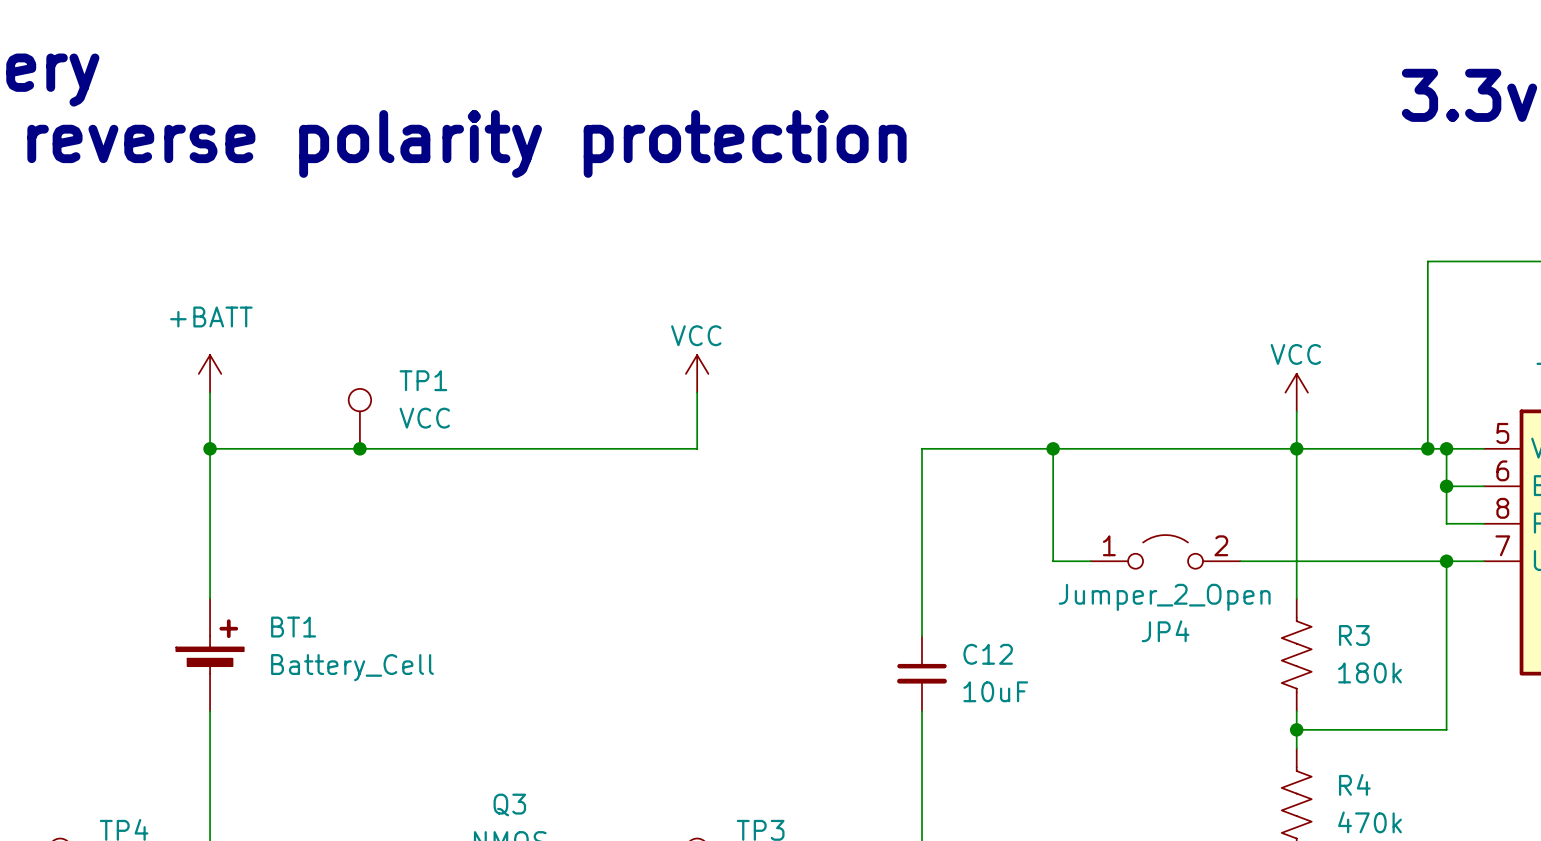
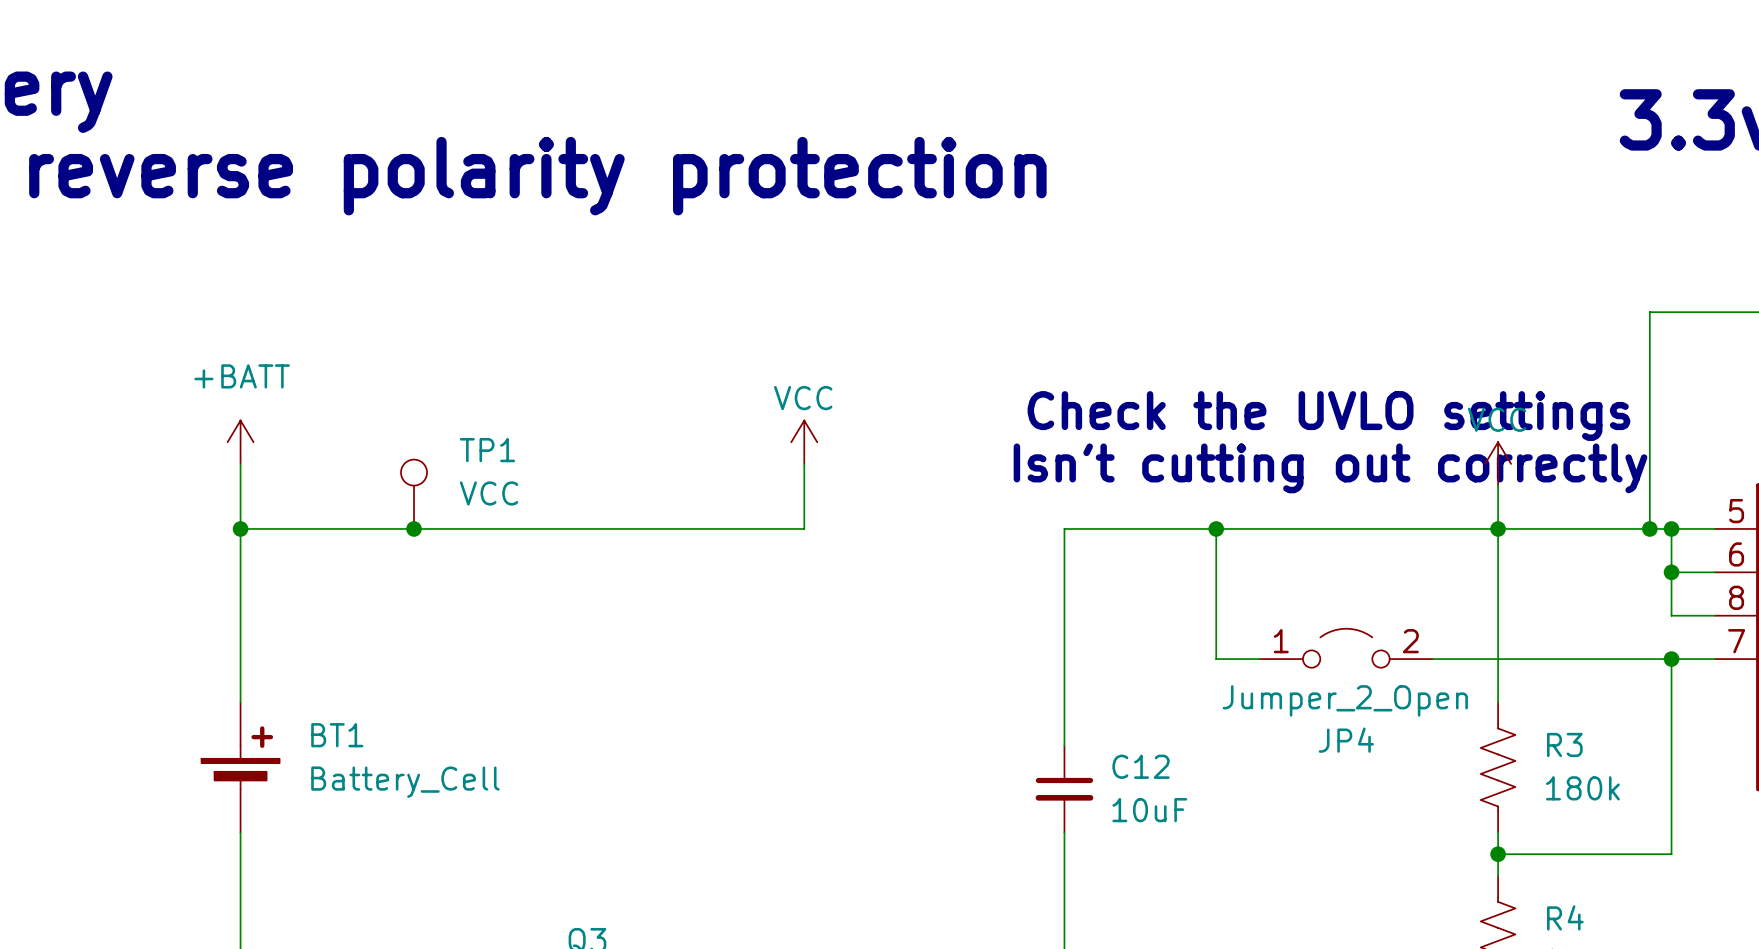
text: none -> Check the UVLO settings (1328, 416)
text: none -> Isn't cutting out correctly (1330, 468)

